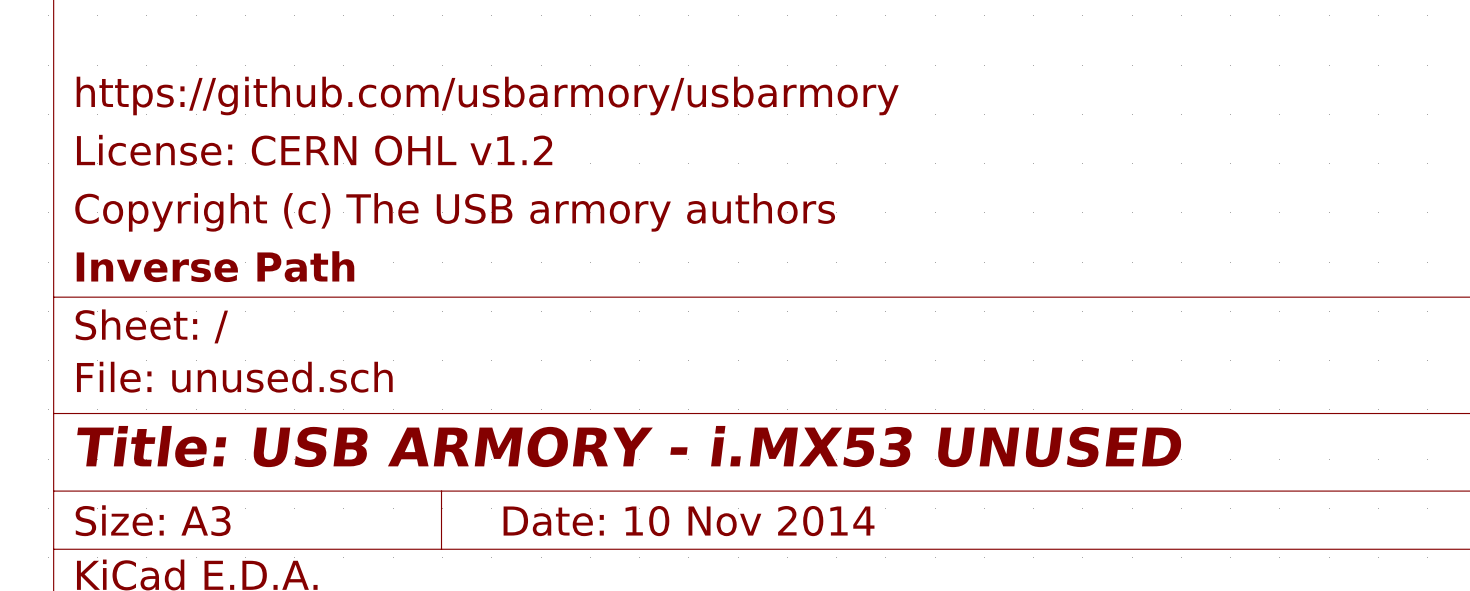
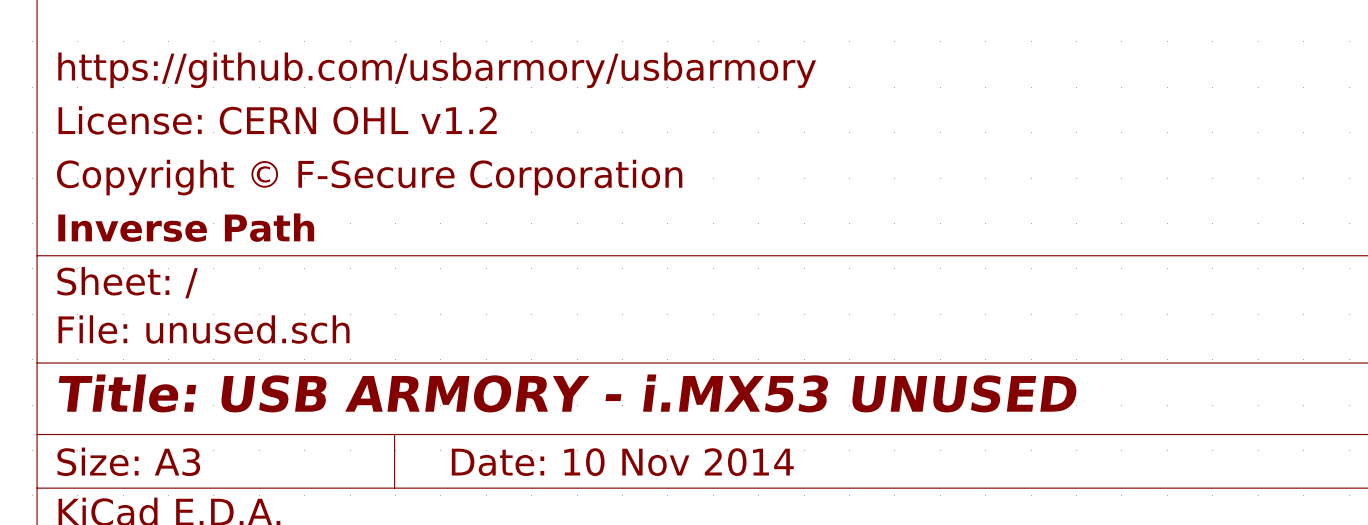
title block: Copyright (c) The USB armory authors (455, 212) -> Copyright © F-Secure Corporation (369, 177)

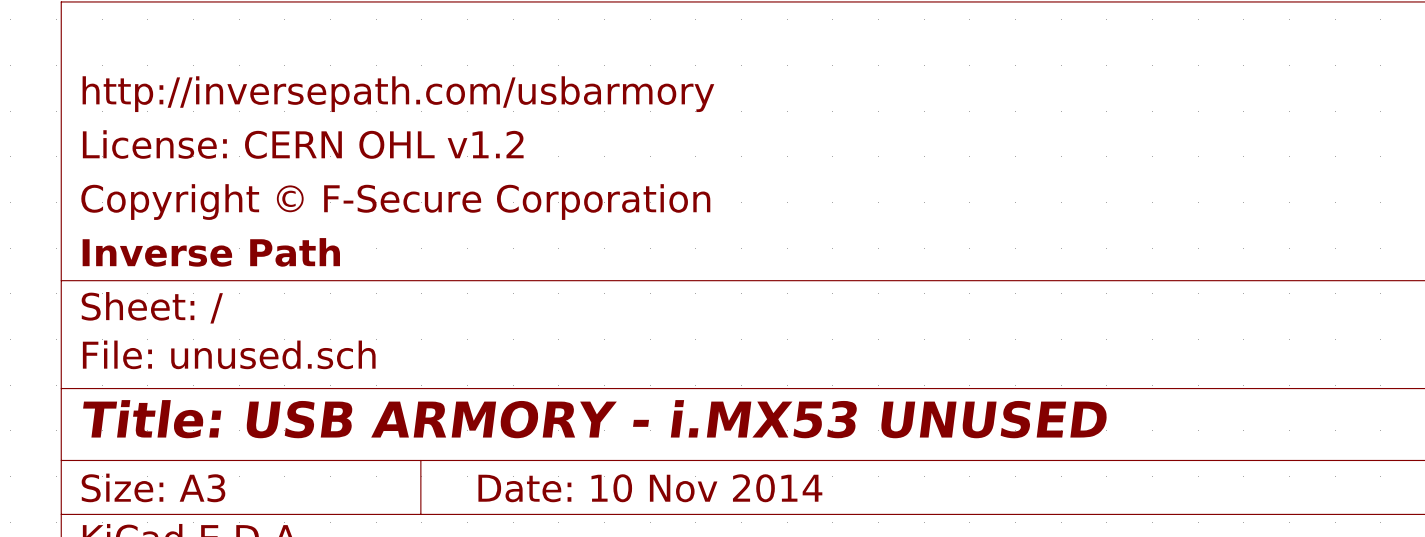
title block: https://github.com/usbarmory/usbarmory (437, 70) -> http://inversepath.com/usbarmory (398, 94)

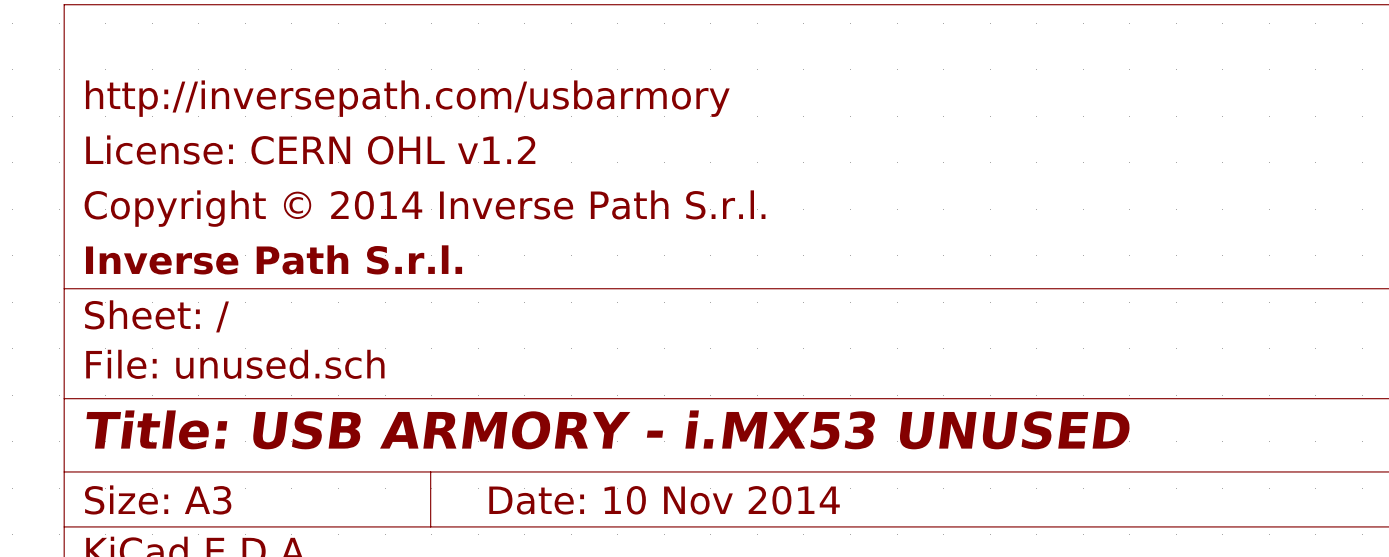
title block: Copyright © F-Secure Corporation (395, 202) -> Copyright © 2014 Inverse Path S.r.l. (425, 208)
title block: Inverse Path (211, 252) -> Inverse Path S.r.l. (274, 259)

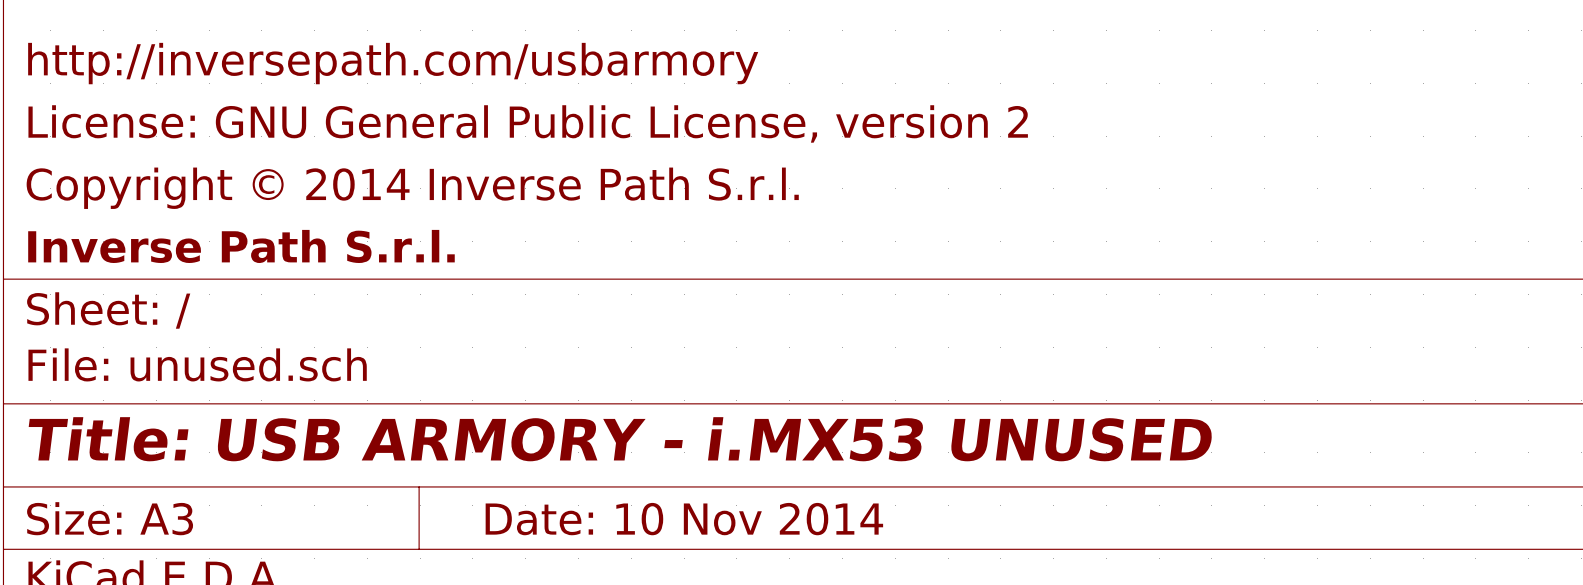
title block: License: CERN OHL v1.2 (310, 149) -> License: GNU General Public License, version 2 (528, 123)

